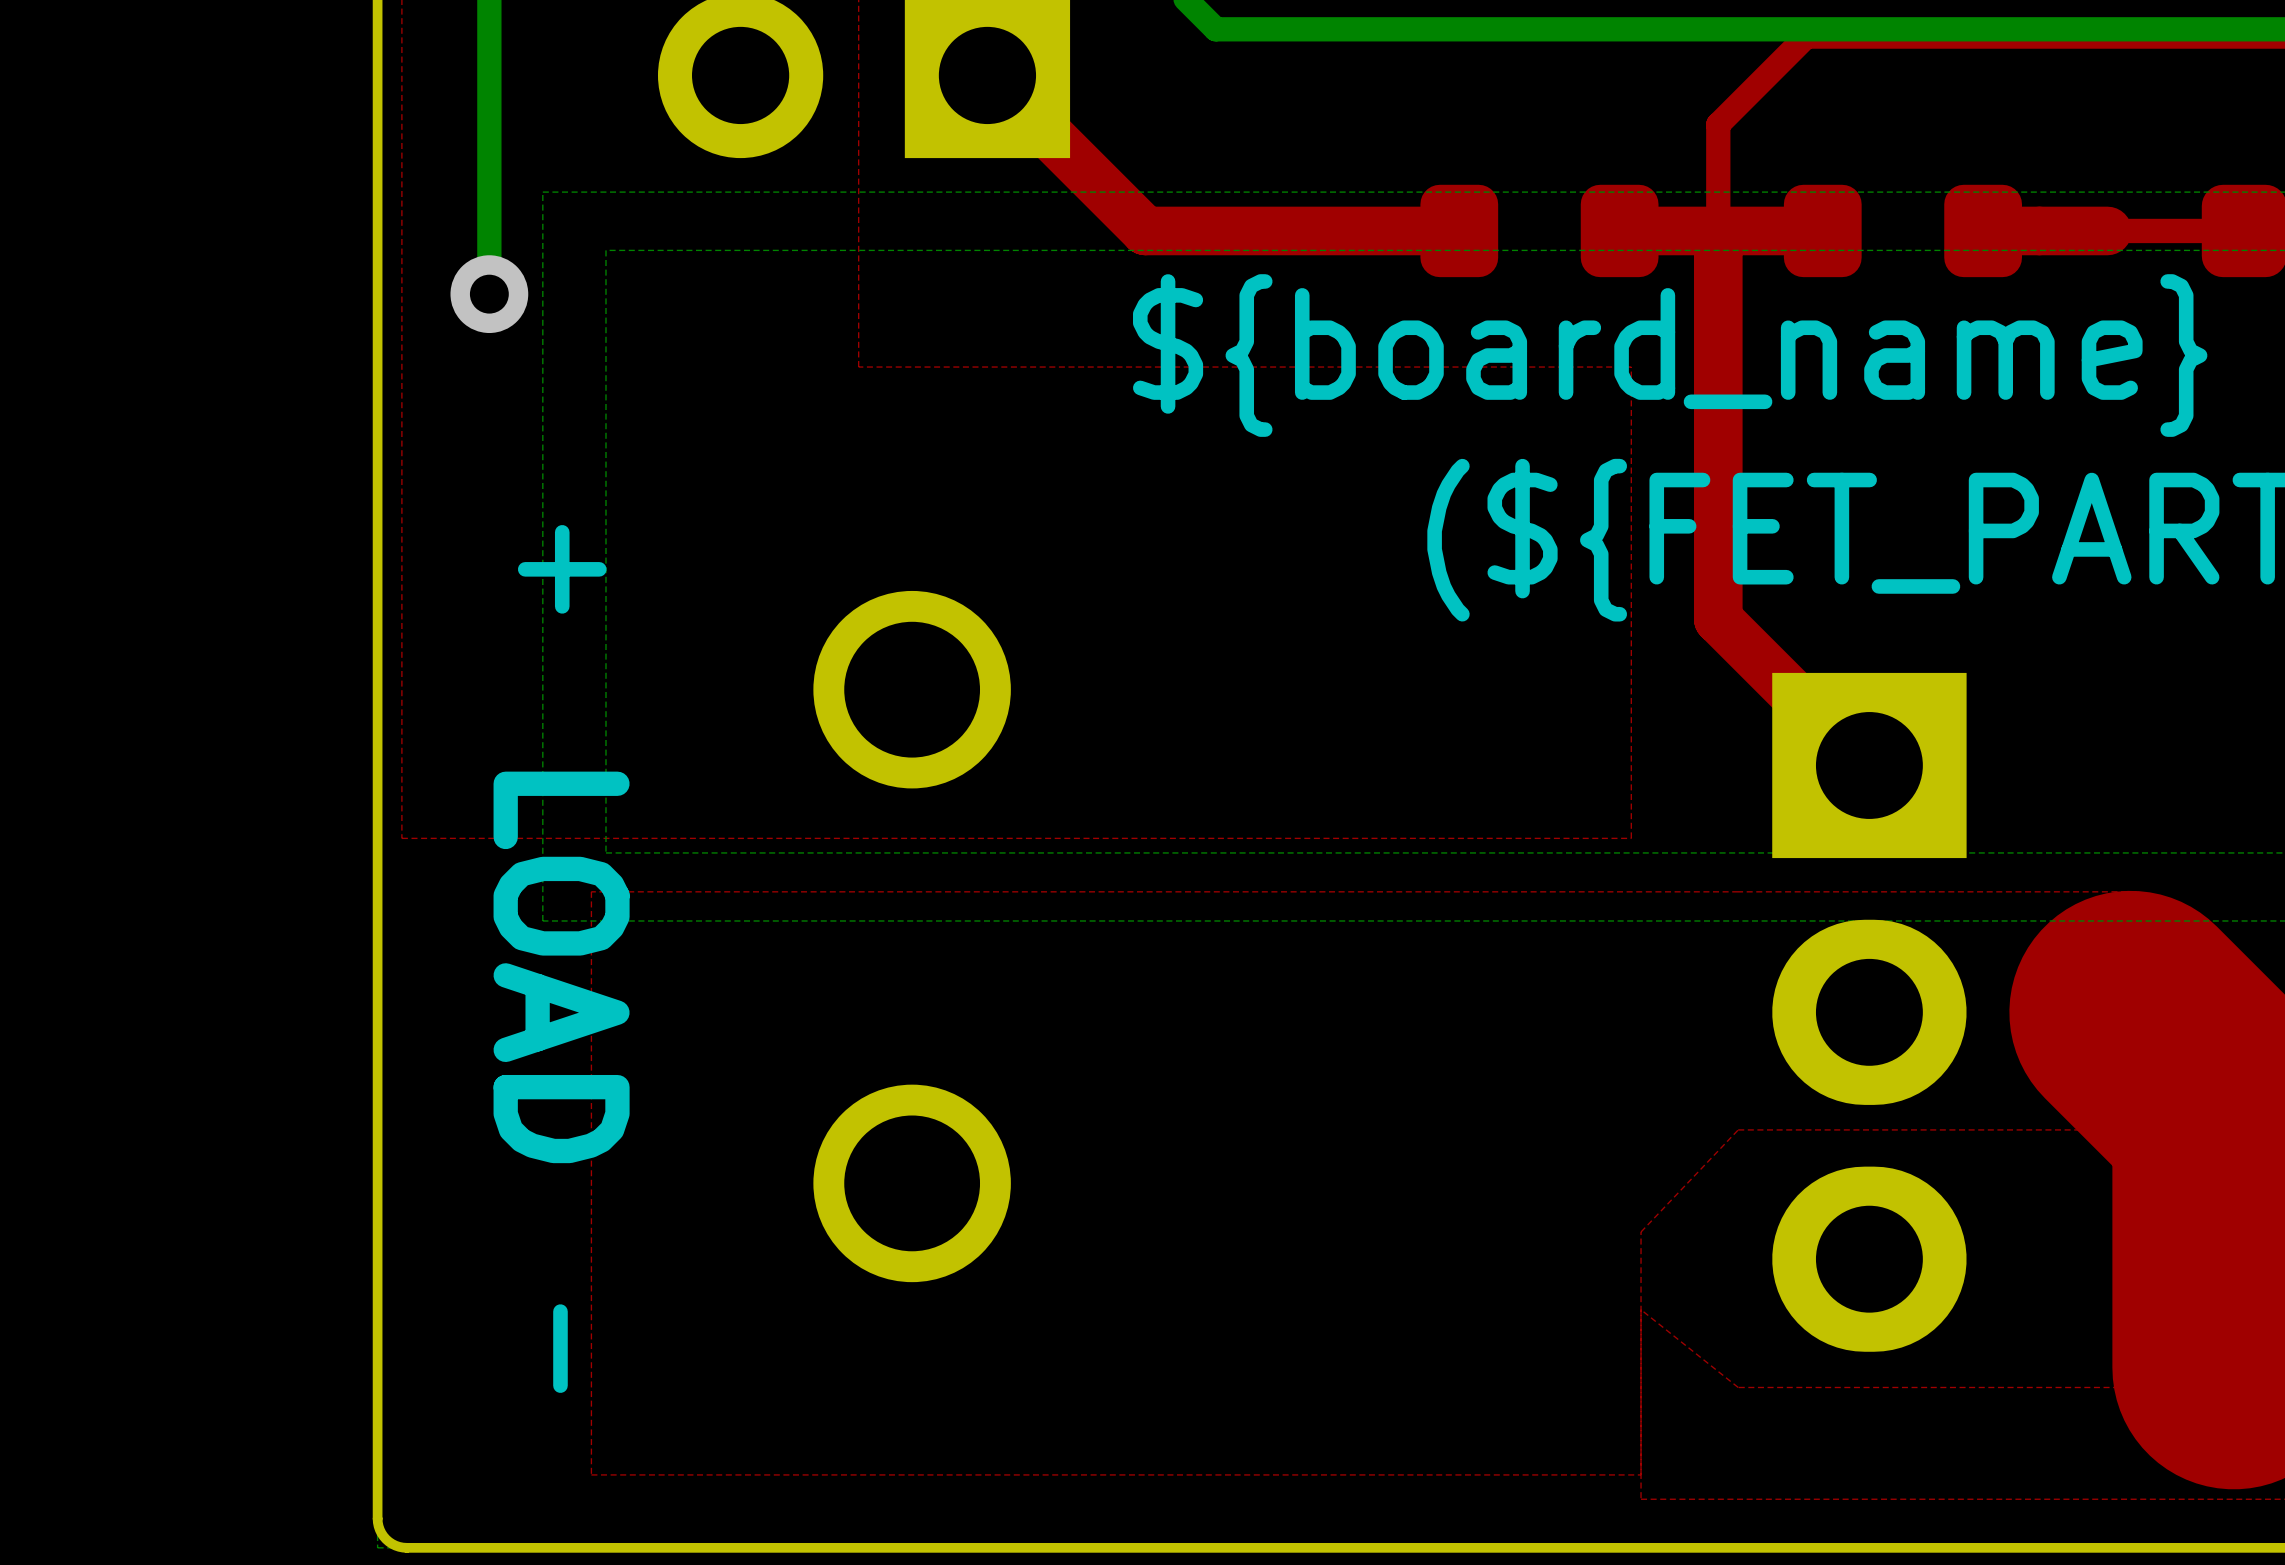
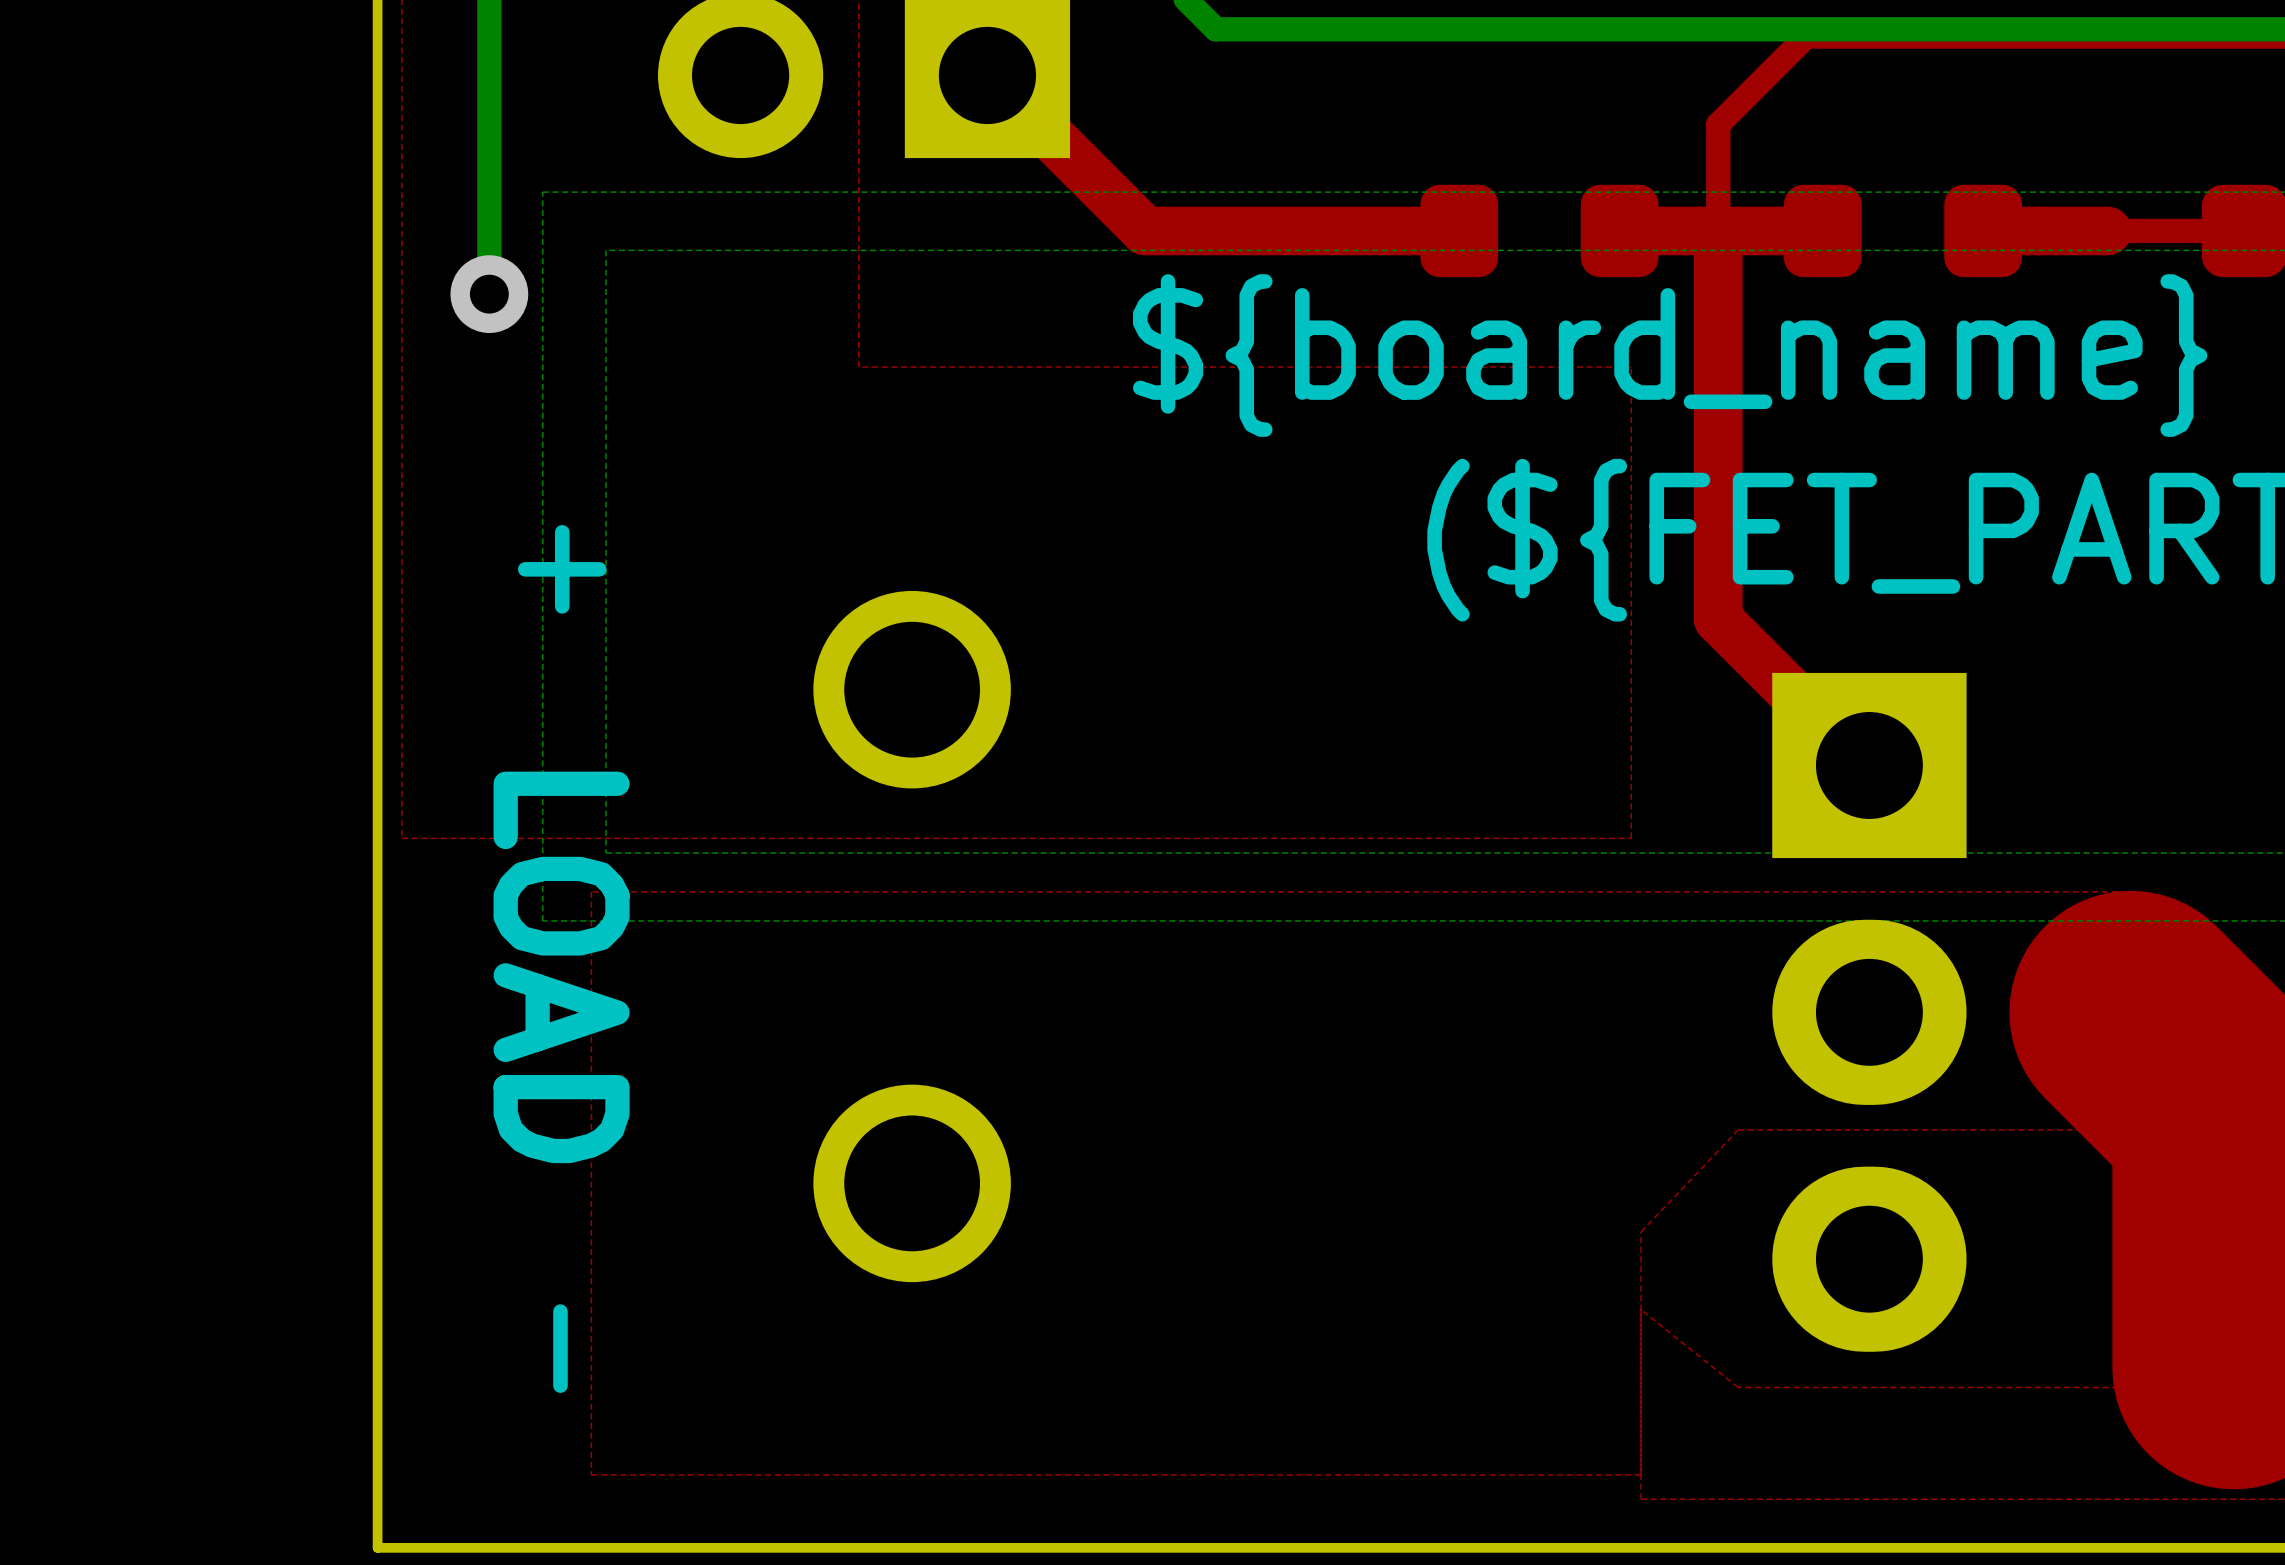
board edge: (377, 1518) (379, 1529) (386, 1539) (395, 1545) (406, 1547) -> (377, 1518) (377, 1547) (406, 1547)

